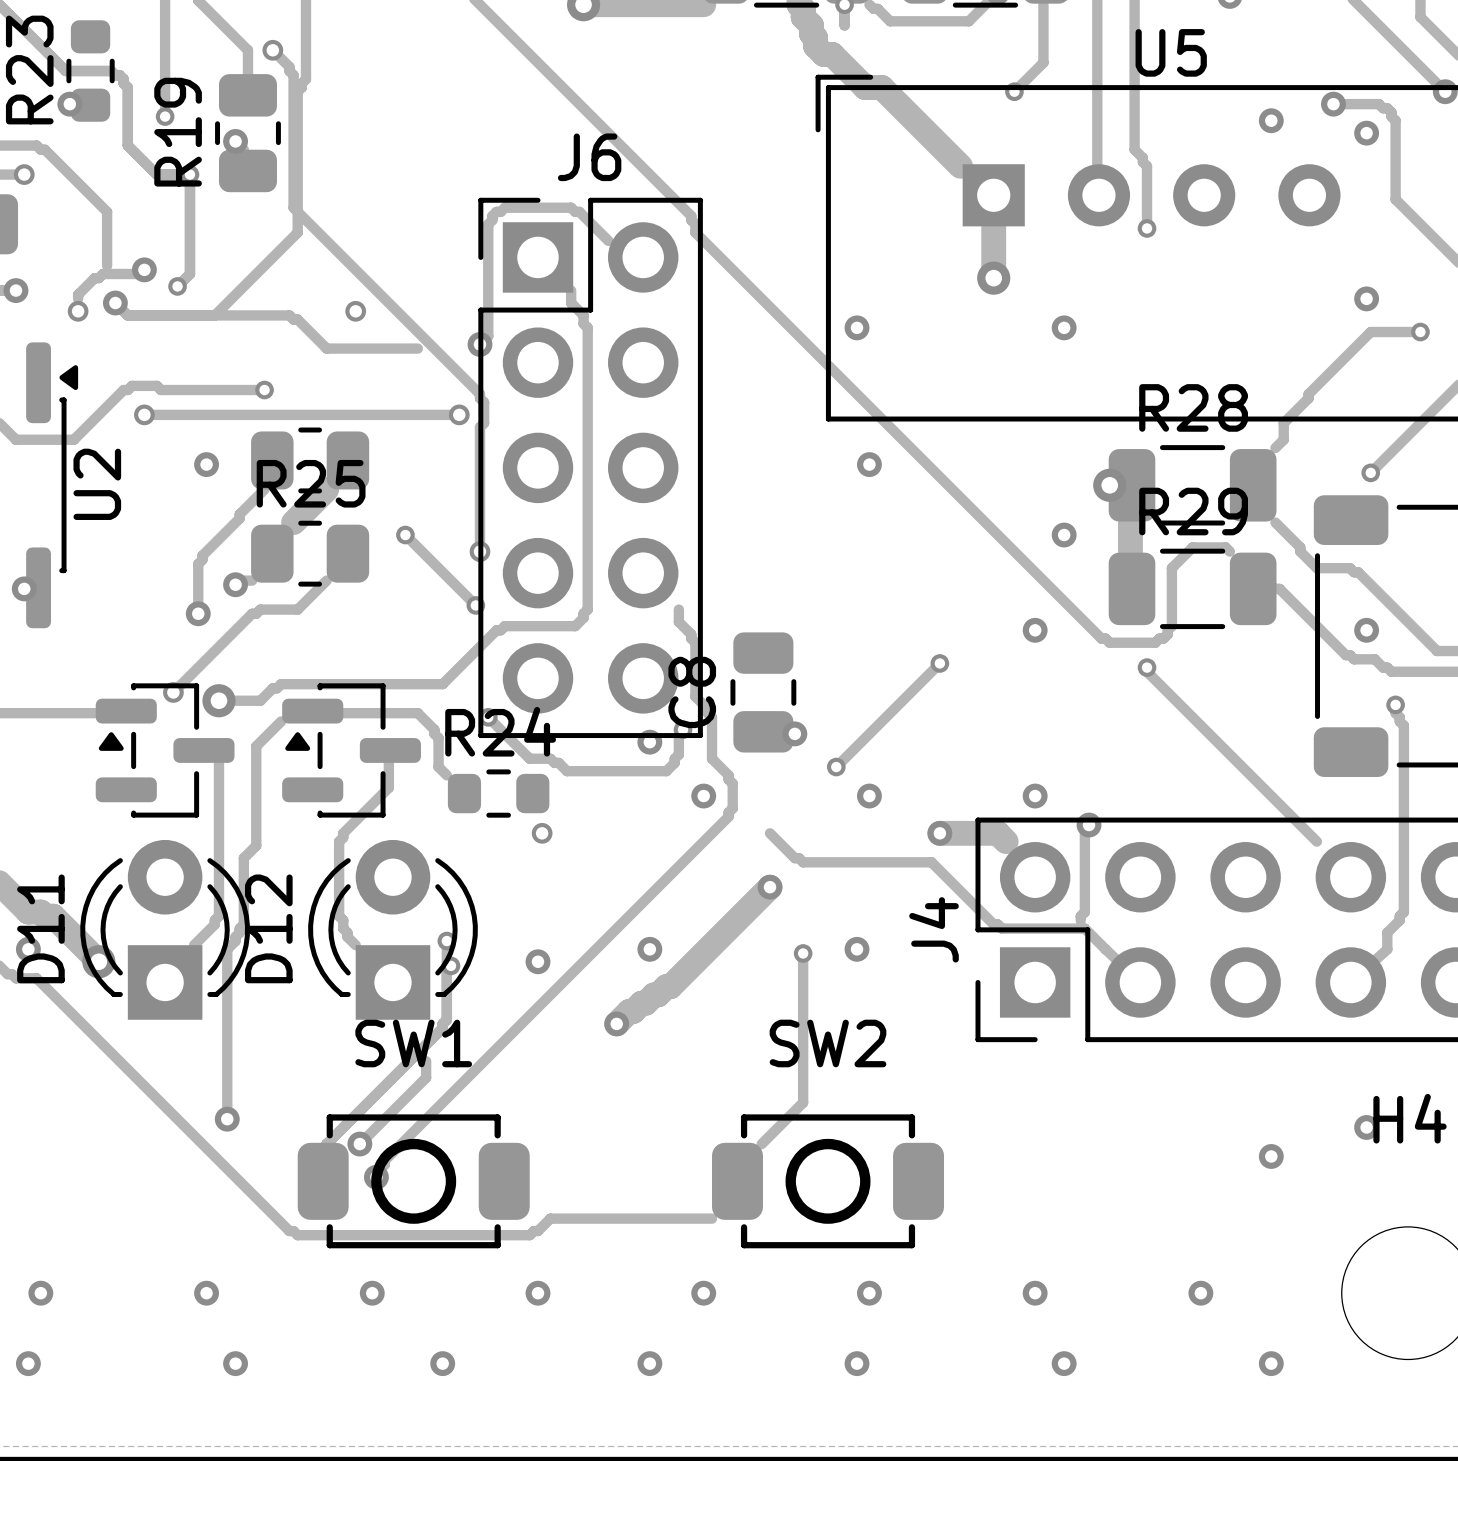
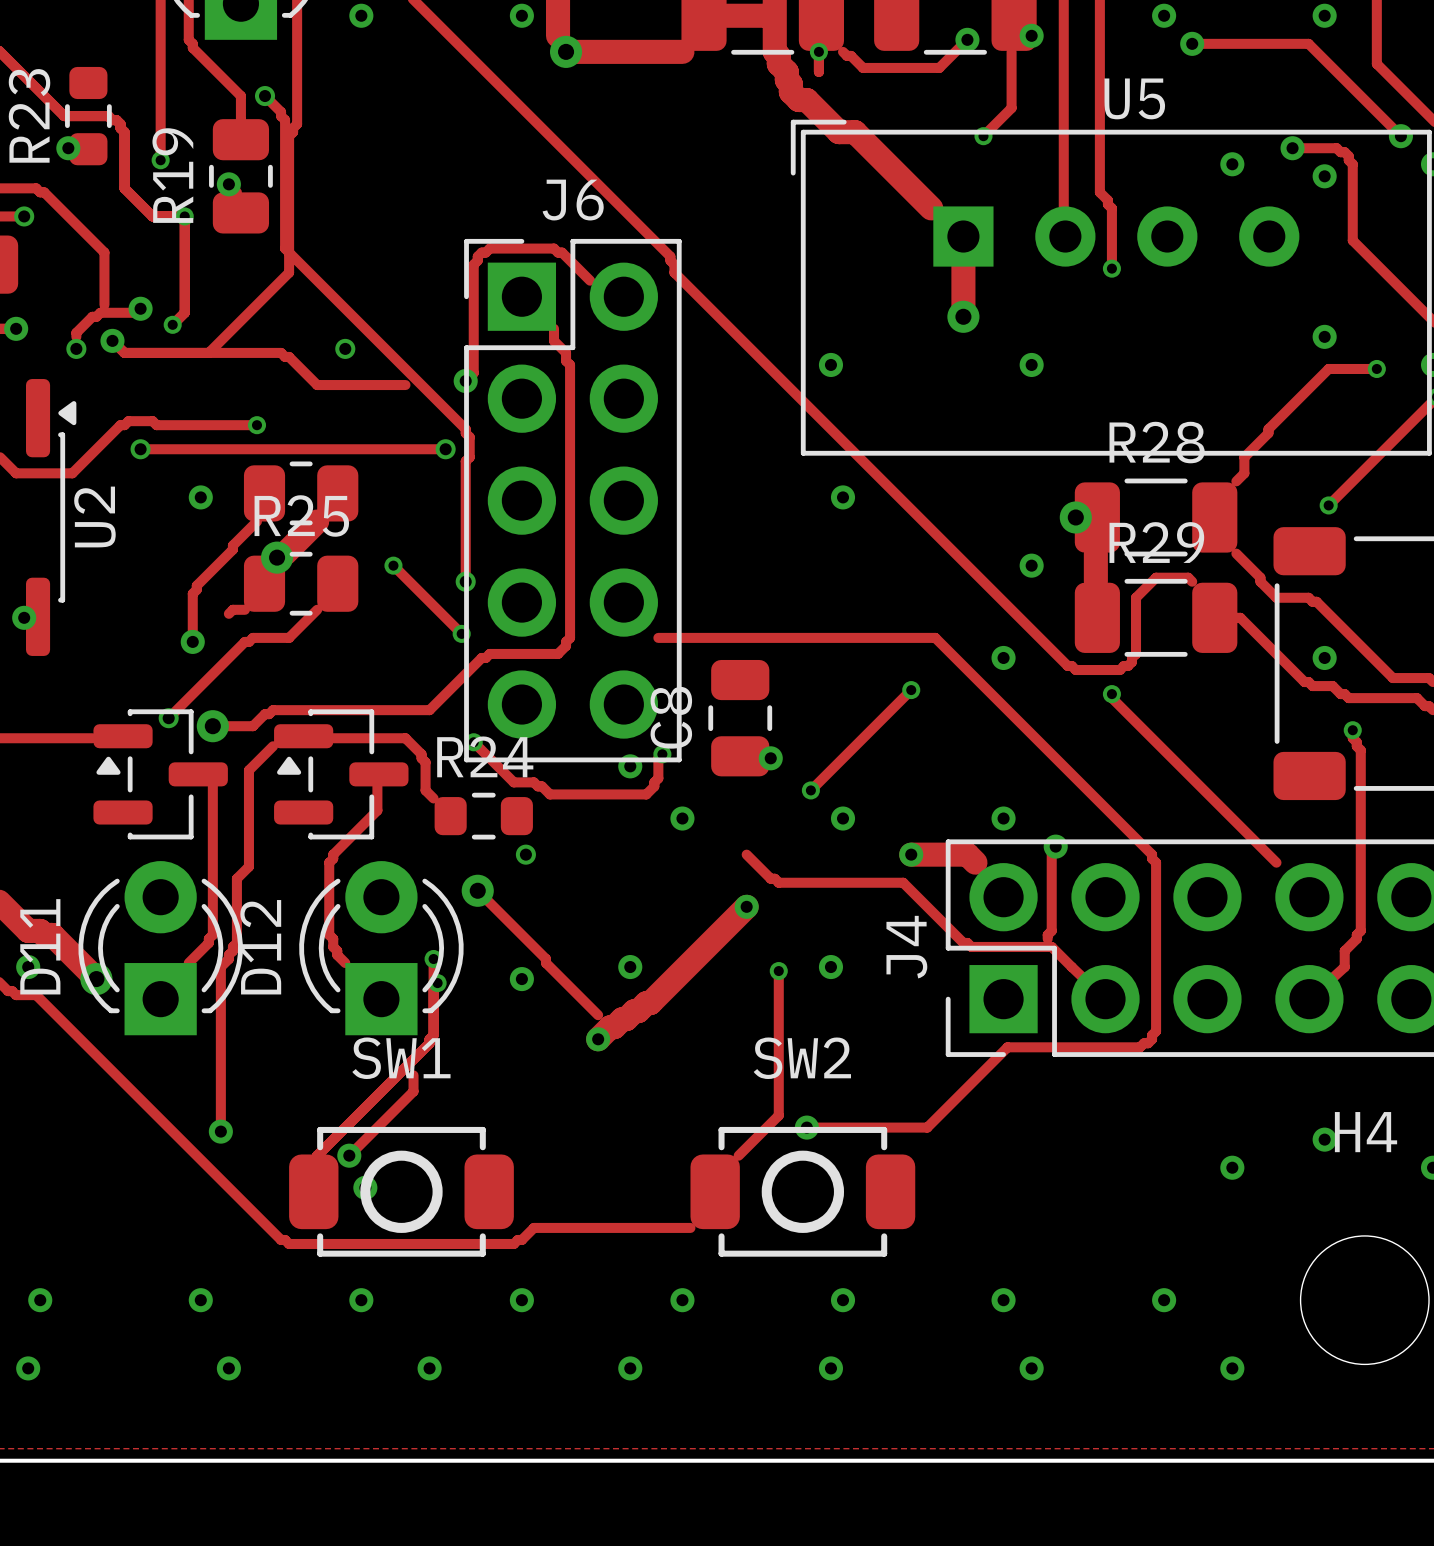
via: none -> (277, 557)
via: (235, 584) -> none
track: (678, 609) (678, 622) (691, 634) (691, 638) (695, 642) (695, 696) (707, 709) (707, 713) (712, 717) (712, 758) (728, 775) (728, 779) (732, 783) (732, 808) (728, 812) (728, 816) (384, 1160) (384, 1164) (376, 1173) (376, 1177) -> (658, 637) (935, 637) (1152, 854) (1152, 858) (1156, 862) (1156, 1031) (1148, 1043) (1144, 1043) (1140, 1047) (1007, 1047) (927, 1127) (806, 1127)
track: none -> (477, 890) (545, 959) (545, 963) (598, 1015)
via: none -> (477, 890)
via: none -> (806, 1127)

